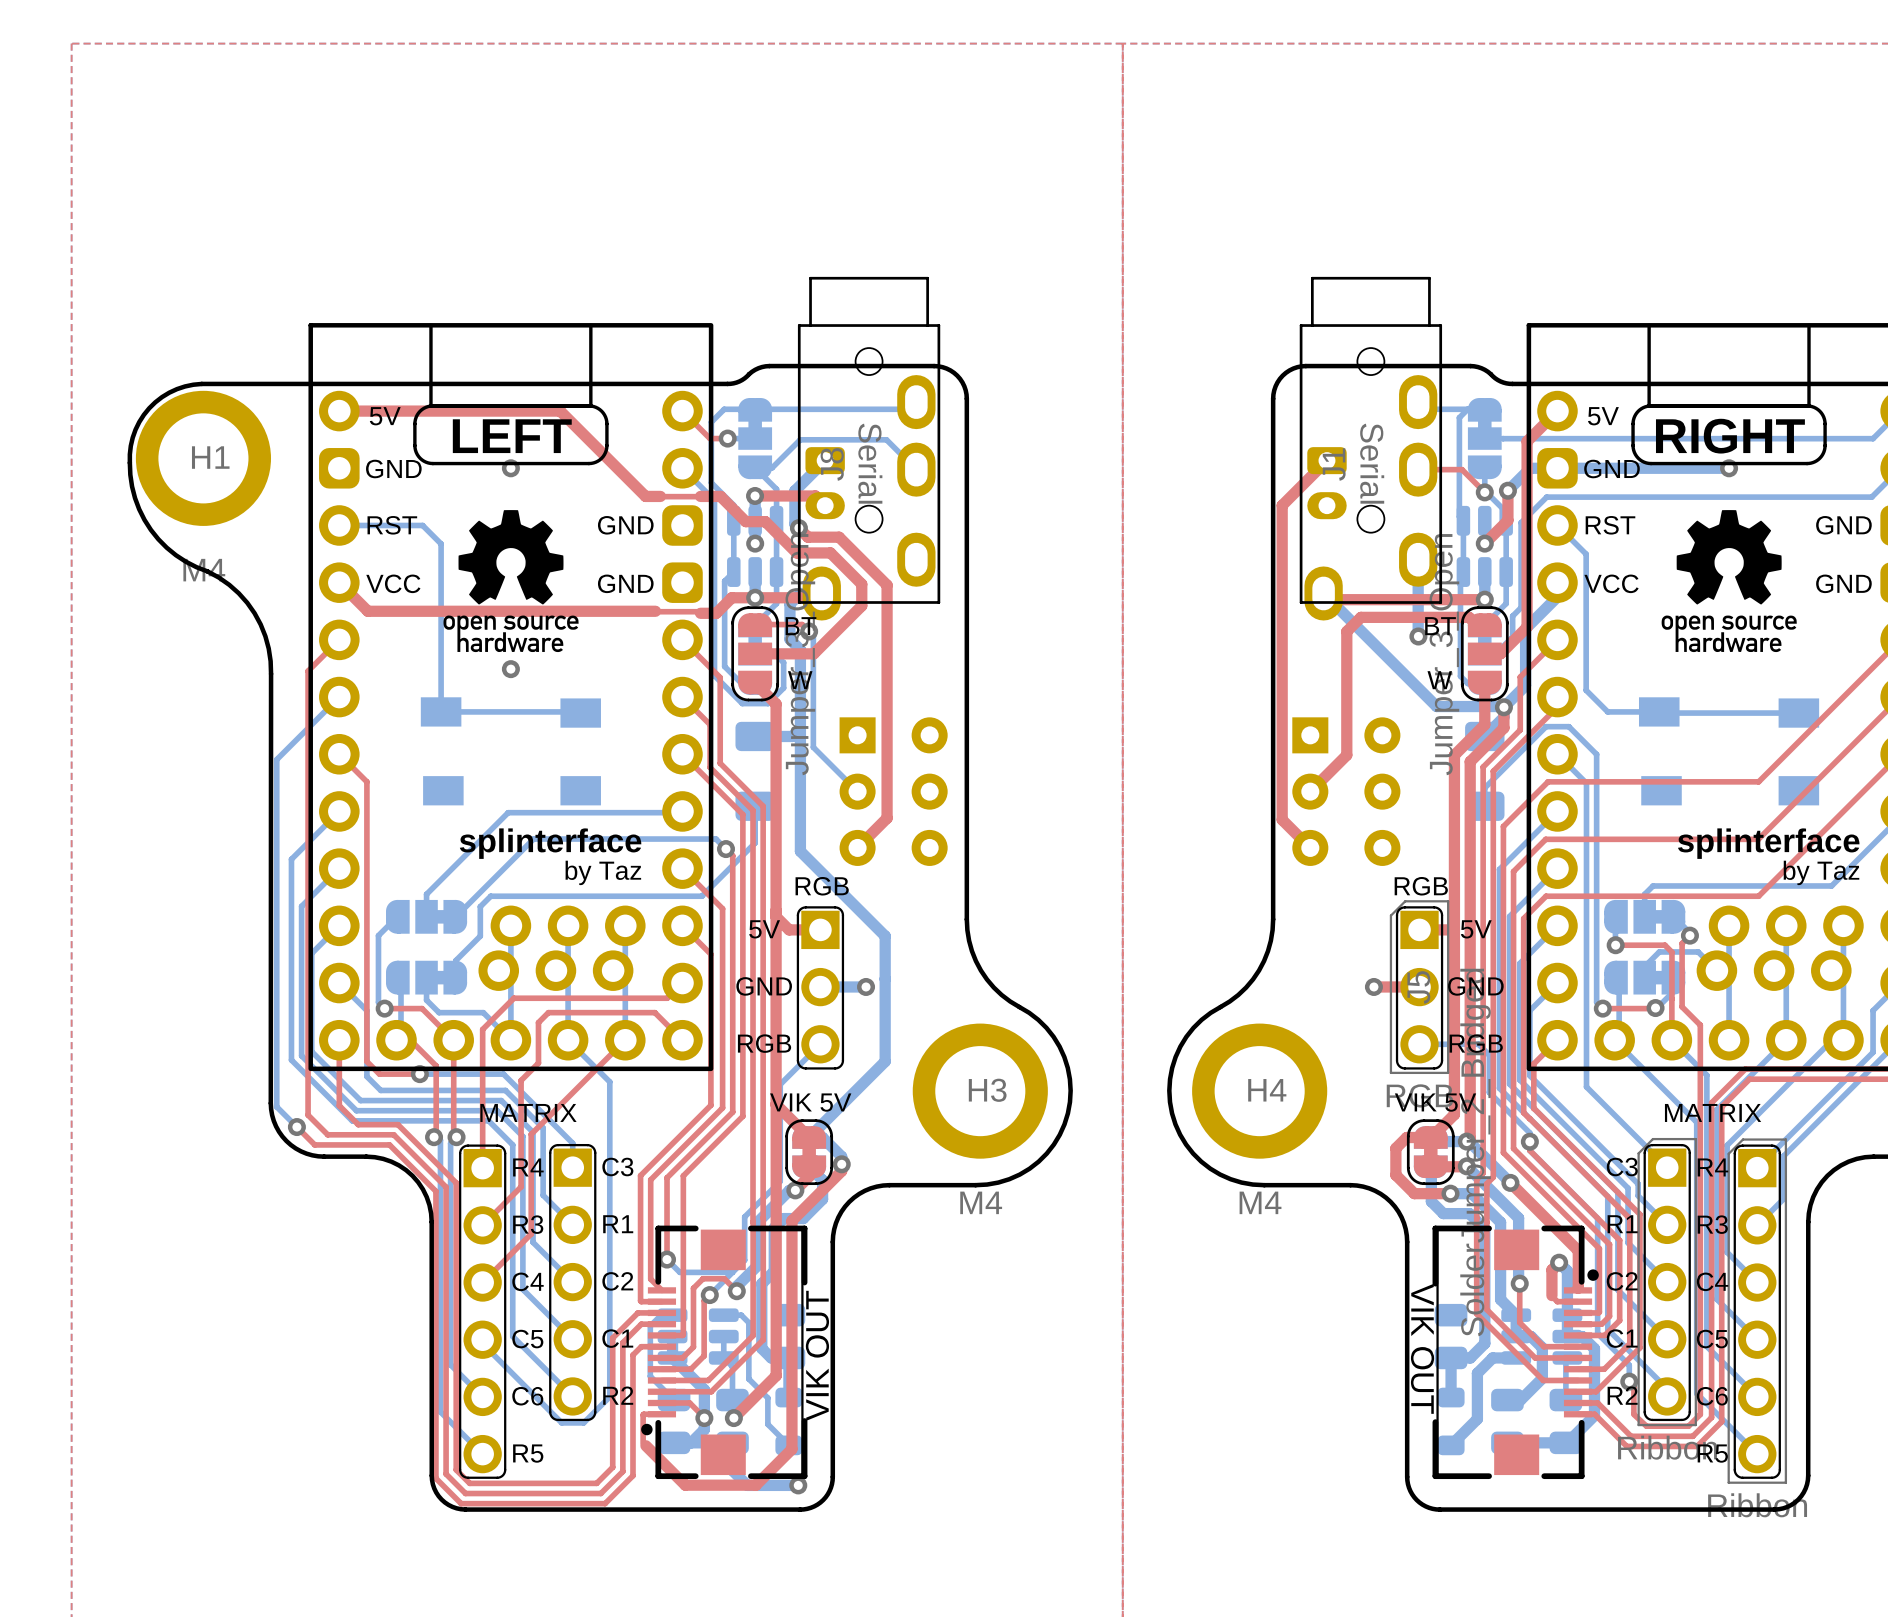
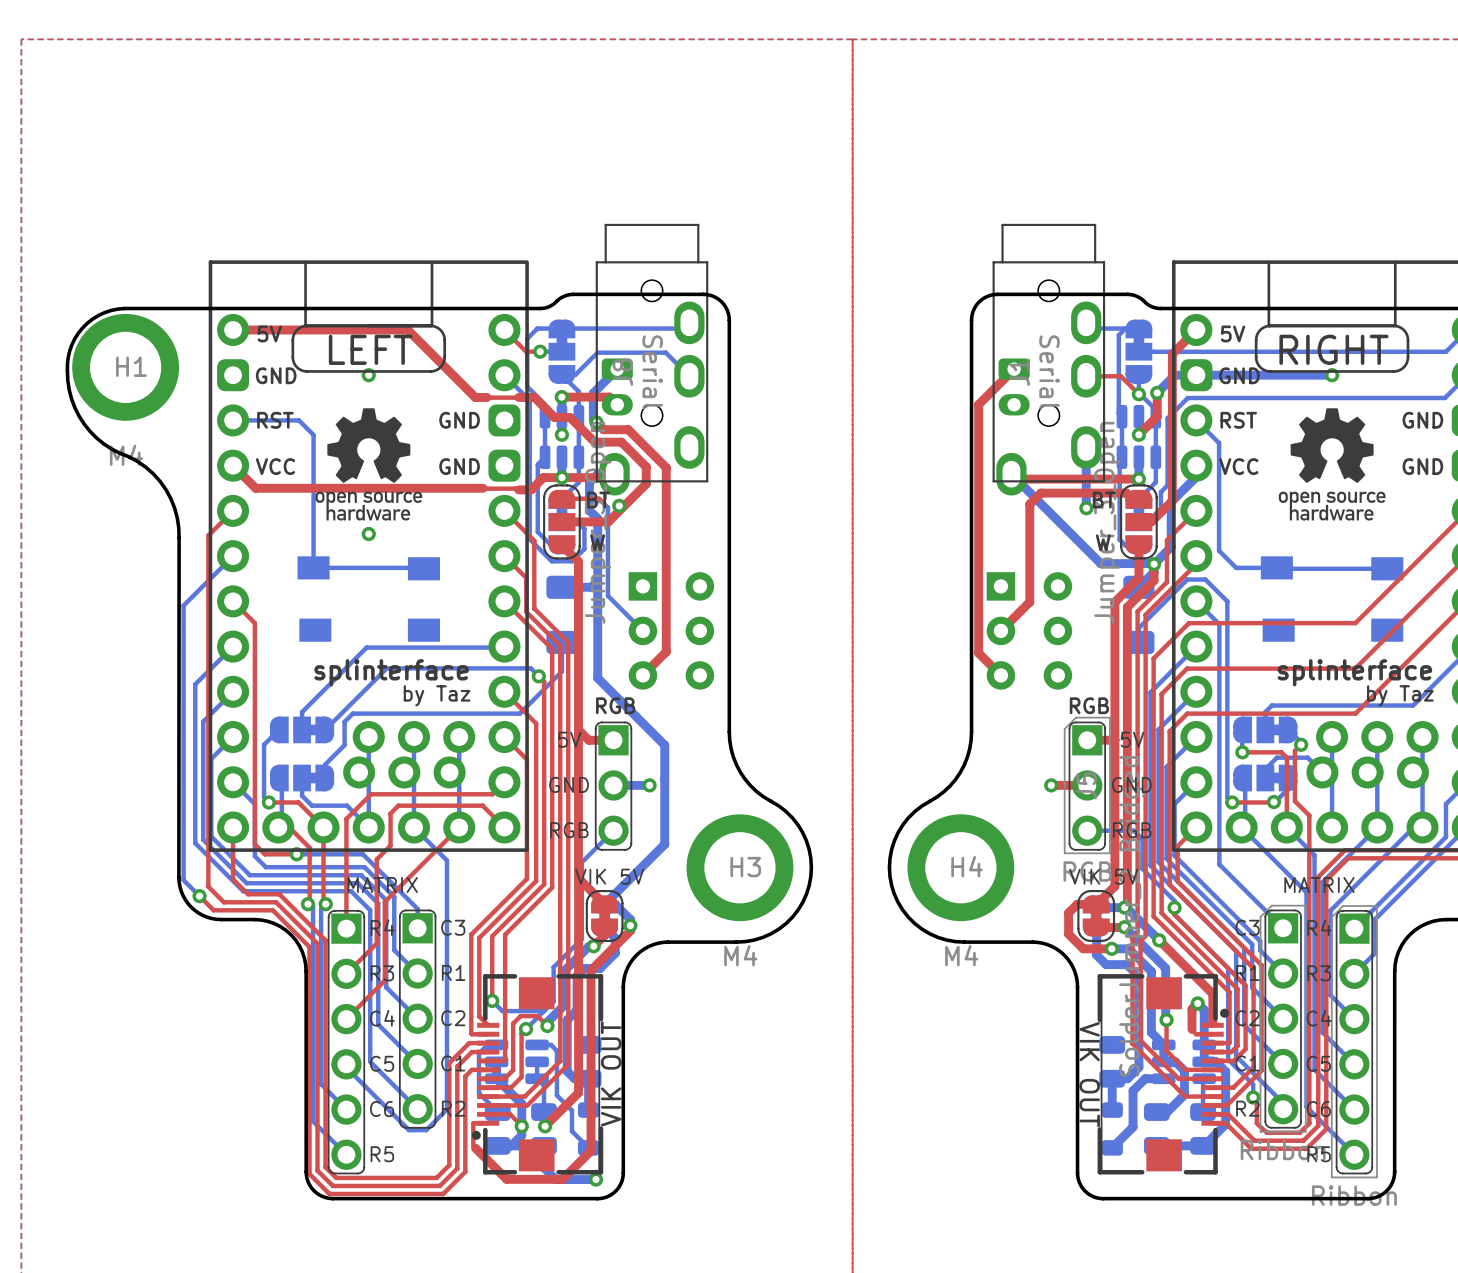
via position: (809, 631) -> (619, 505)

